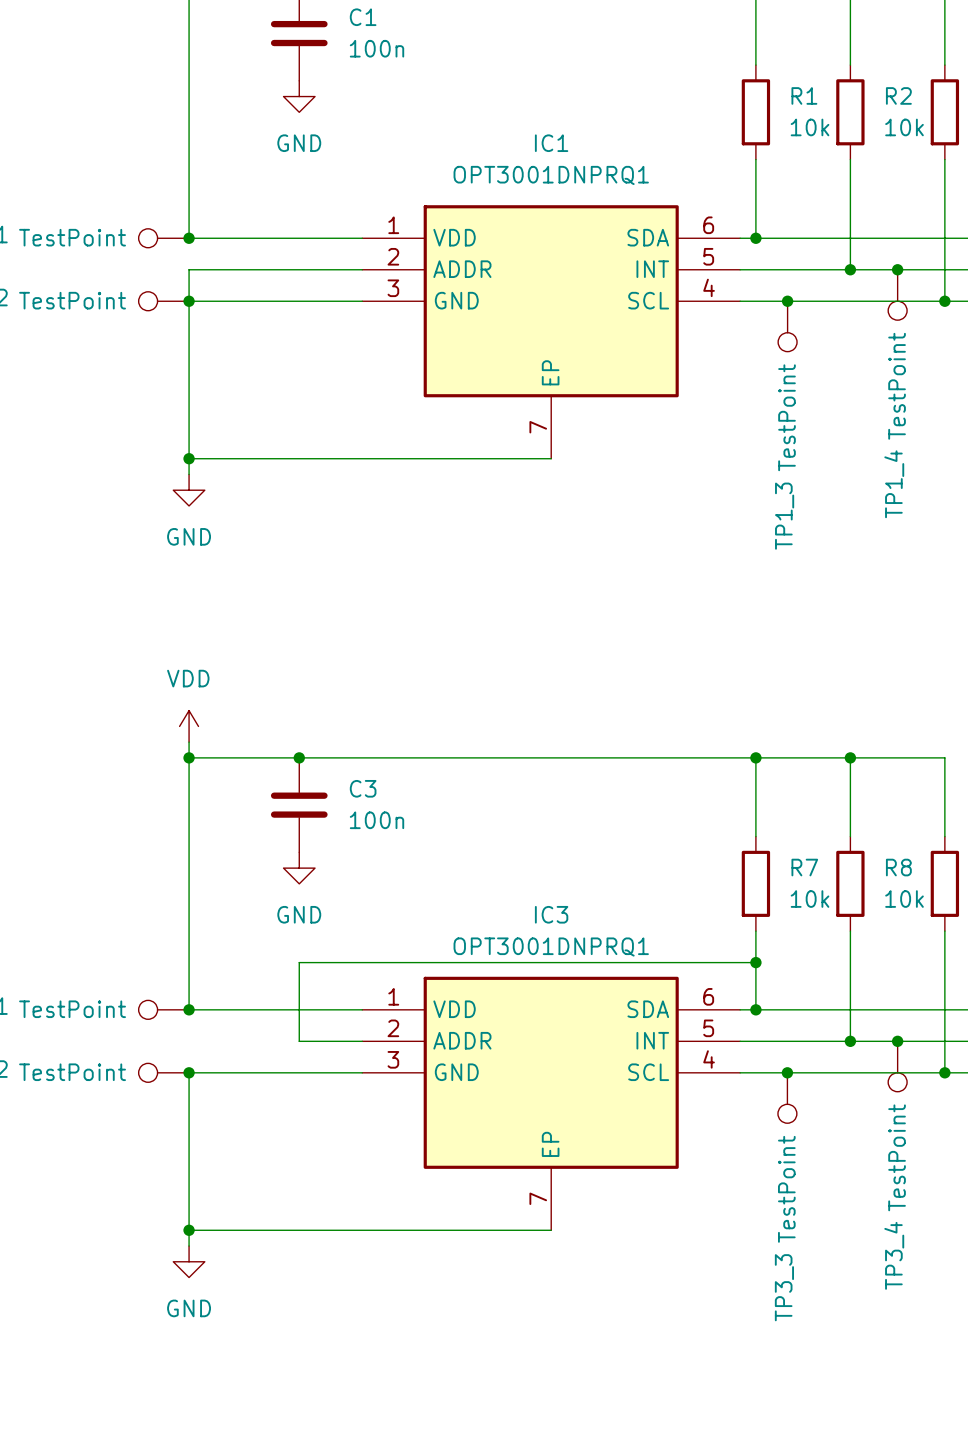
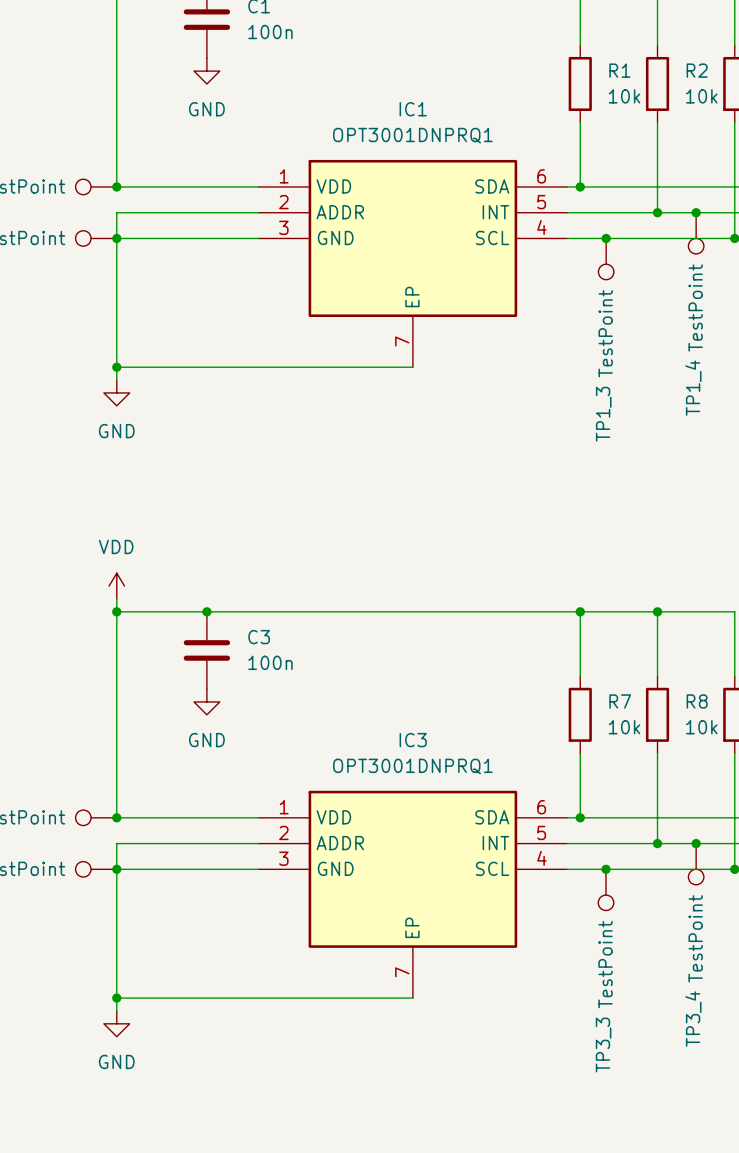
wire: (755, 962) (299, 962) (299, 1041) -> (116, 869) (116, 843) (206, 843)
junction: (755, 962) -> none

